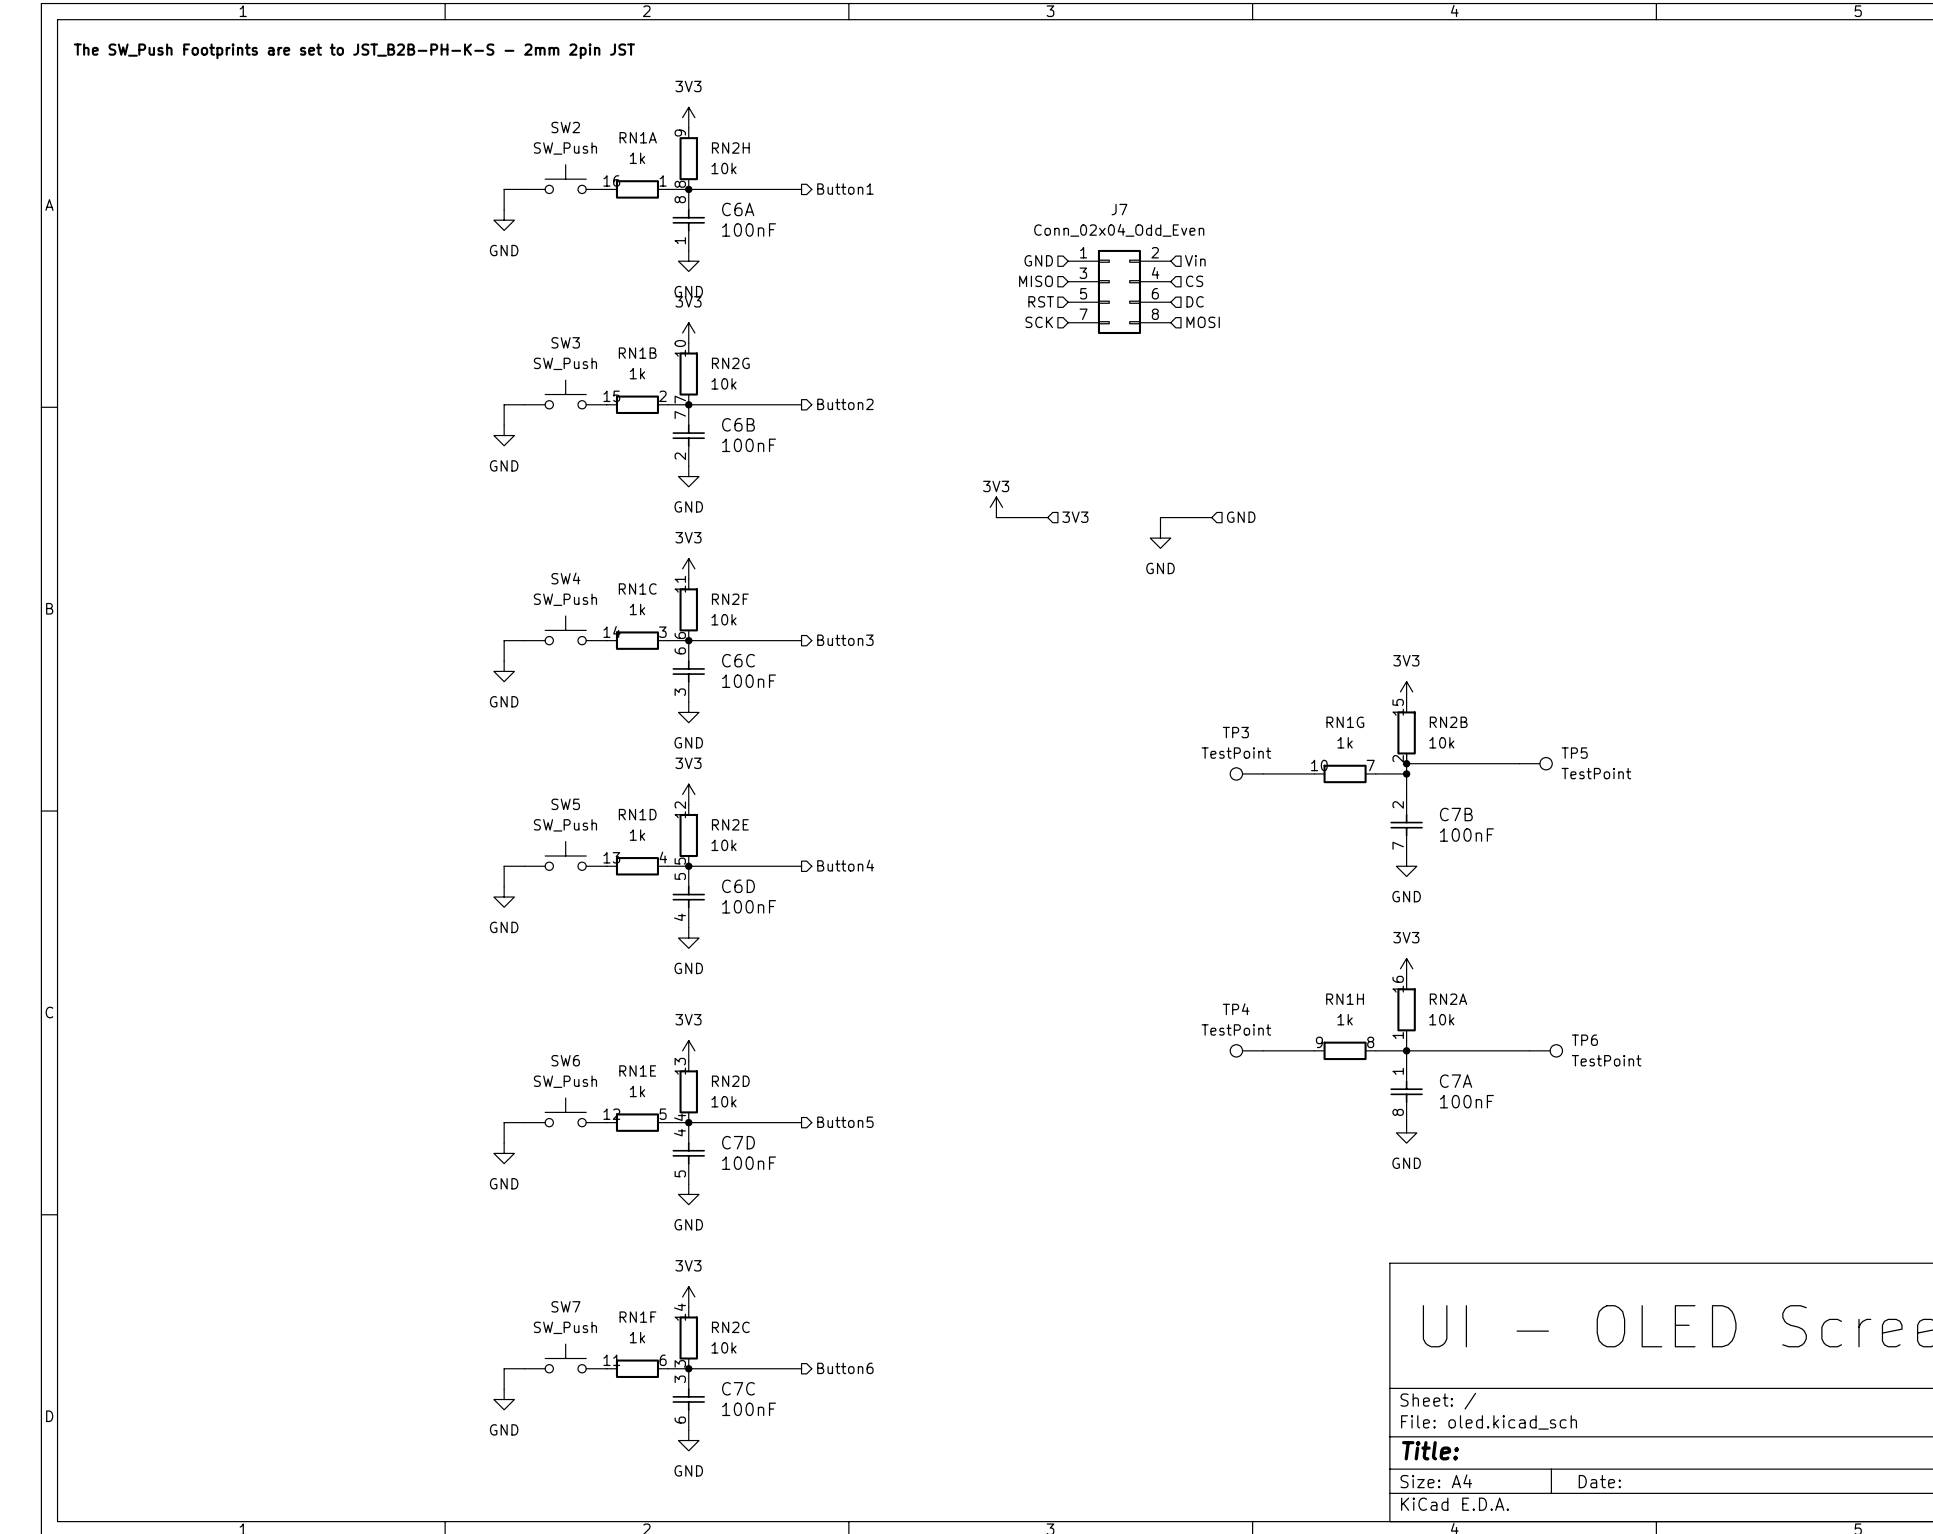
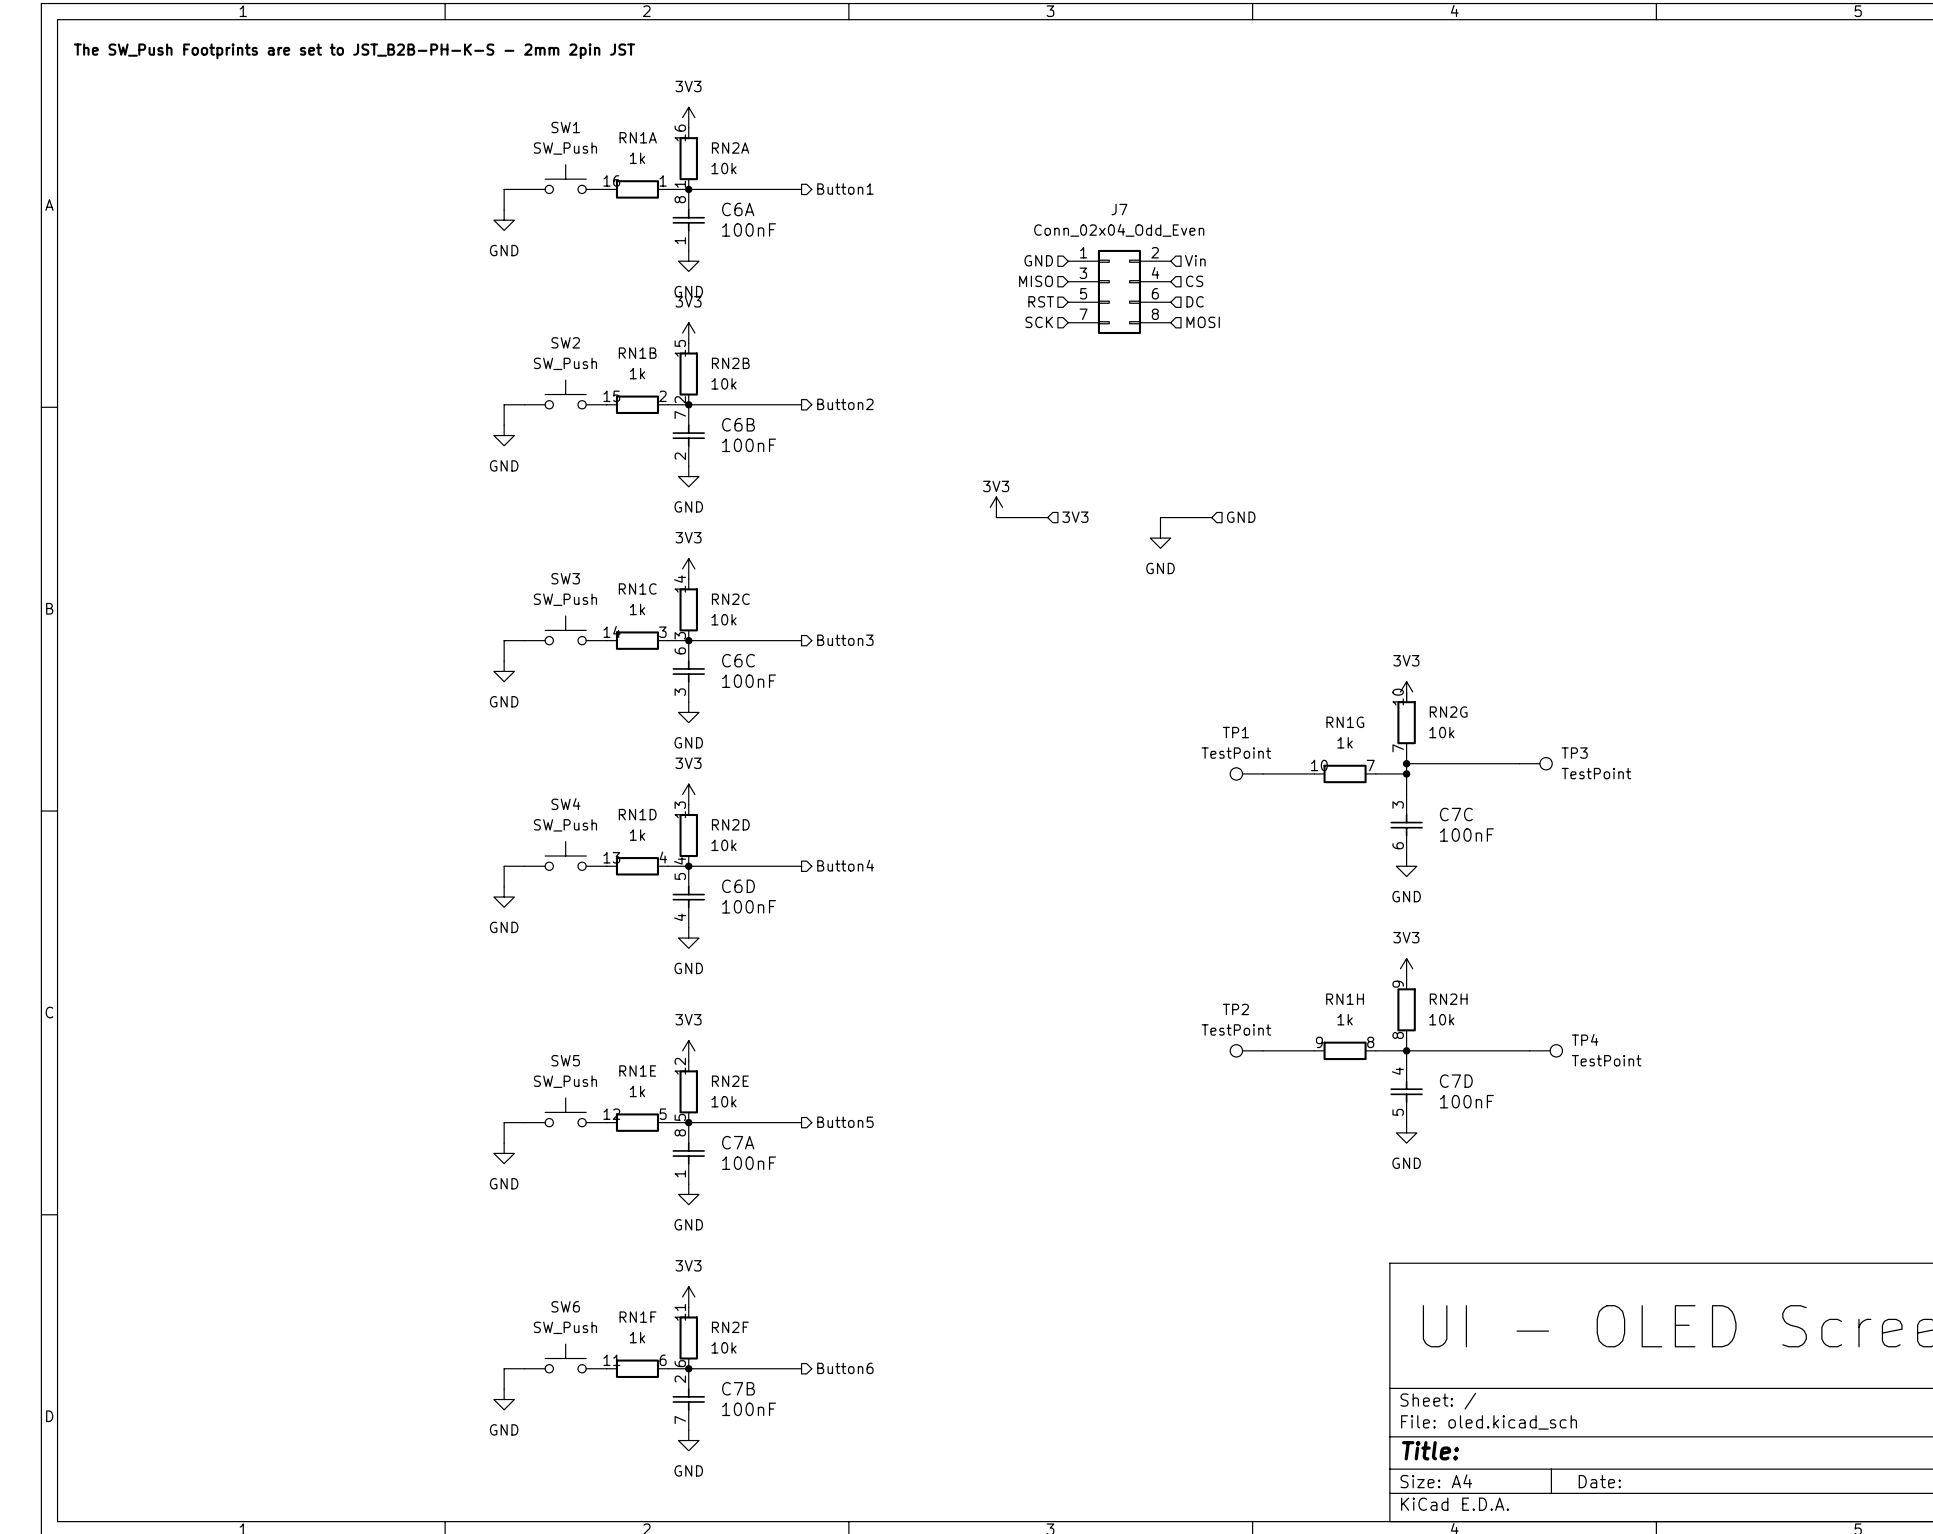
SW2 name: SW2 (565, 127) -> SW1 (565, 127)
RN2H position: (688, 158) -> (1406, 1009)
SW3 name: SW3 (565, 342) -> SW2 (565, 342)
RN2G position: (688, 374) -> (1406, 722)
SW4 name: SW4 (565, 578) -> SW3 (565, 578)
RN2F position: (688, 609) -> (688, 1337)
TP3 name: TP3 (1235, 732) -> TP1 (1235, 732)
RN2B position: (1406, 732) -> (688, 374)
TP5 name: TP5 (1574, 753) -> TP3 (1574, 753)
SW5 name: SW5 (565, 804) -> SW4 (565, 804)
C7B position: (1406, 825) -> (688, 1399)
RN2E position: (688, 835) -> (688, 1091)
TP4 name: TP4 (1236, 1009) -> TP2 (1235, 1009)
RN2A position: (1406, 1009) -> (688, 158)
TP6 name: TP6 (1584, 1040) -> TP4 (1585, 1039)
SW6 name: SW6 (565, 1060) -> SW5 (565, 1060)
RN2D position: (688, 1091) -> (688, 835)
C7A rotation: 0° (1406, 1091) -> 180° (688, 1153)
C7A position: (1406, 1091) -> (688, 1153)
C7D position: (688, 1153) -> (1406, 1091)
SW7 name: SW7 (565, 1306) -> SW6 (565, 1306)
RN2C position: (688, 1337) -> (688, 609)
C7C position: (688, 1399) -> (1406, 825)

